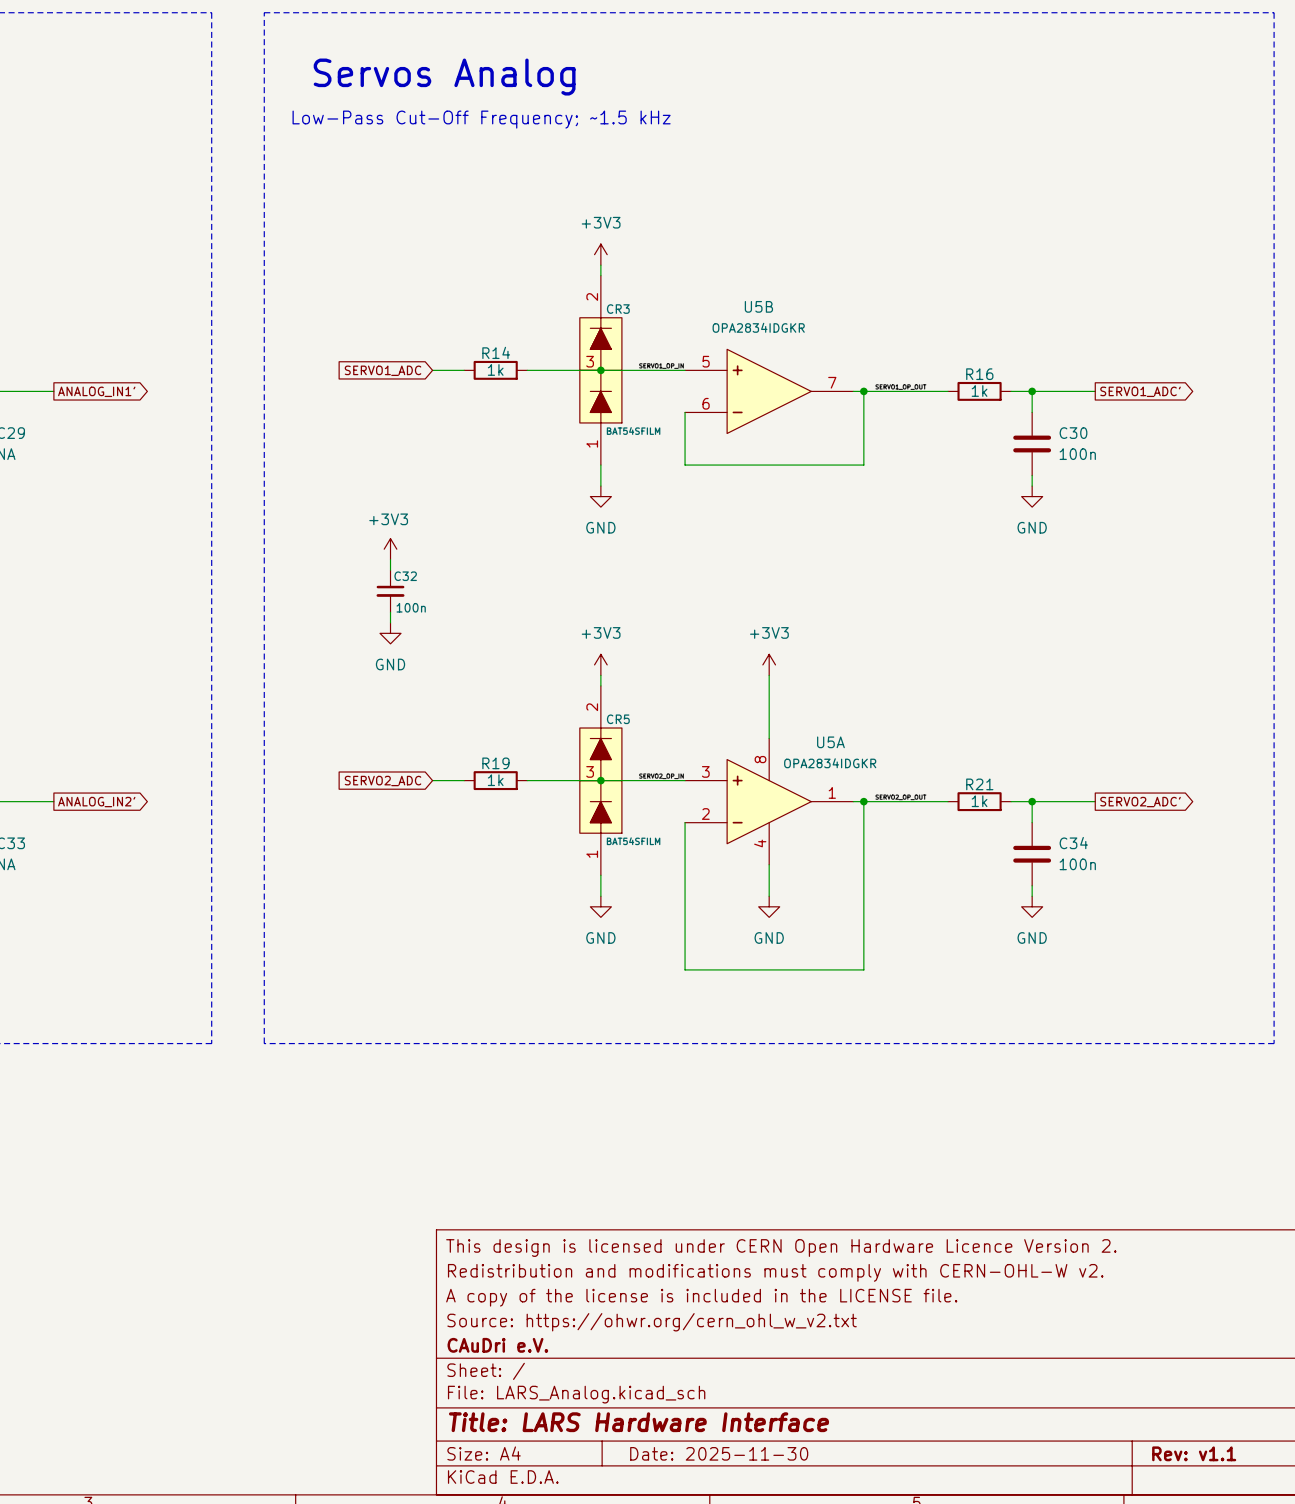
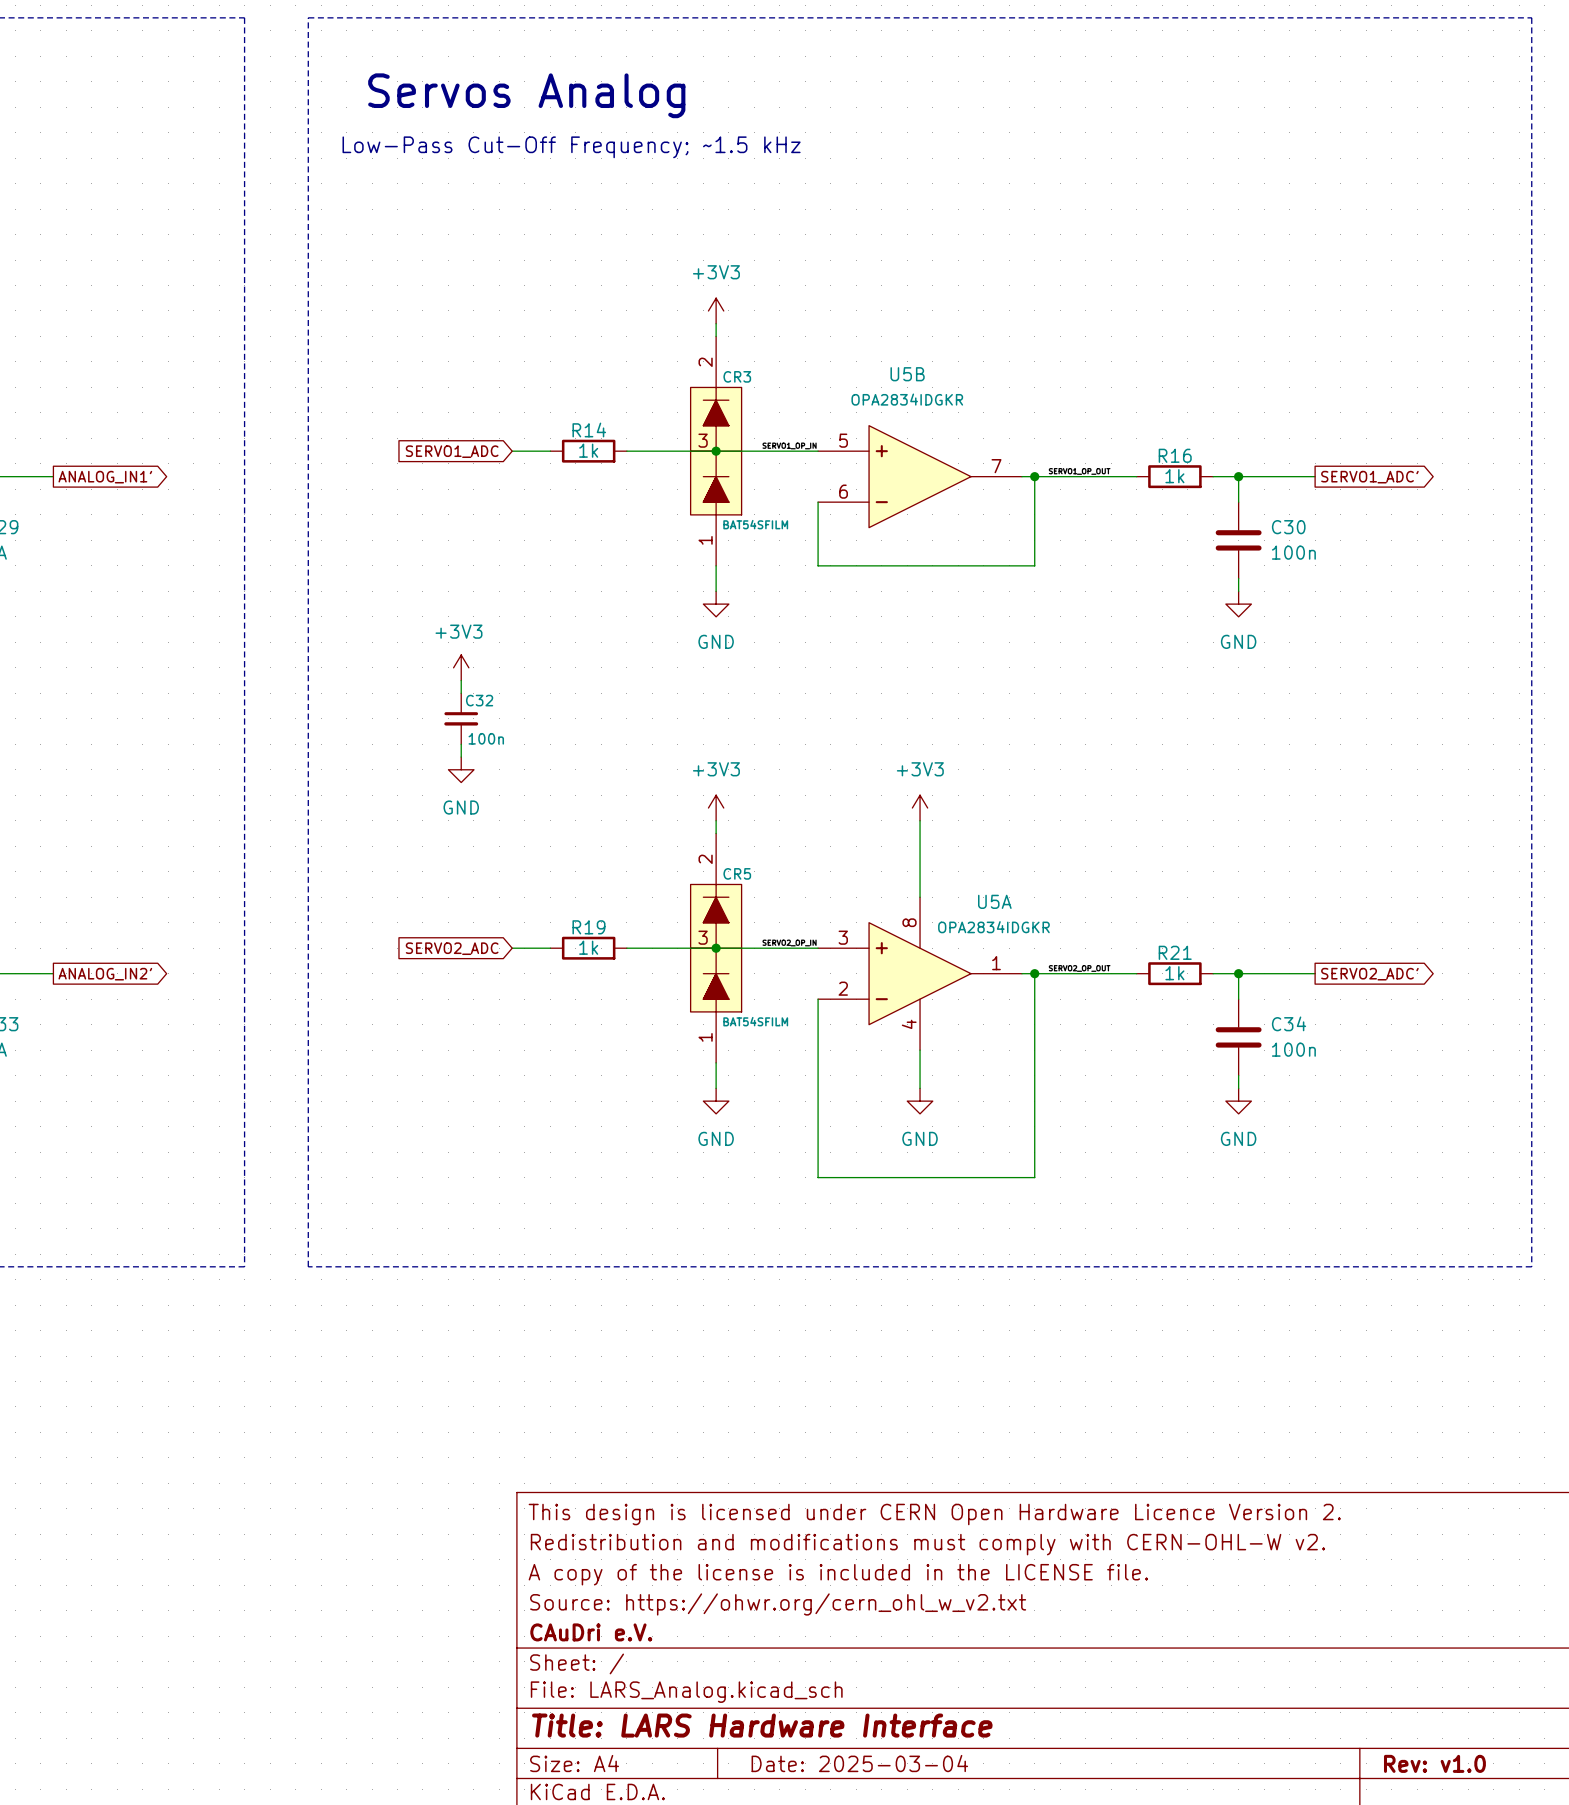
title block: Date: 2025-11-30 (719, 1453) -> Date: 2025-03-04 (859, 1763)
title block: Rev: v1.1 (1194, 1453) -> Rev: v1.0 (1434, 1763)

